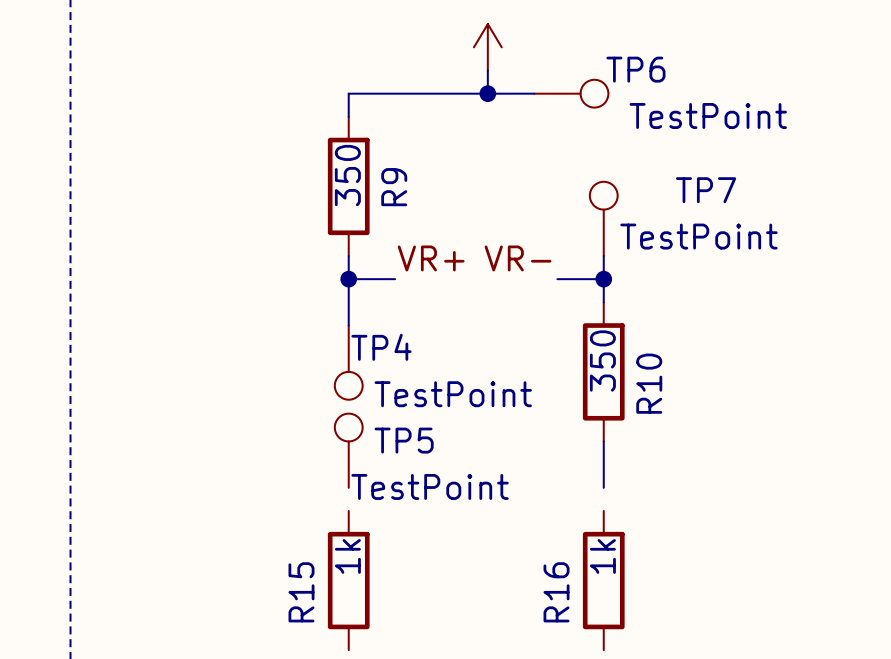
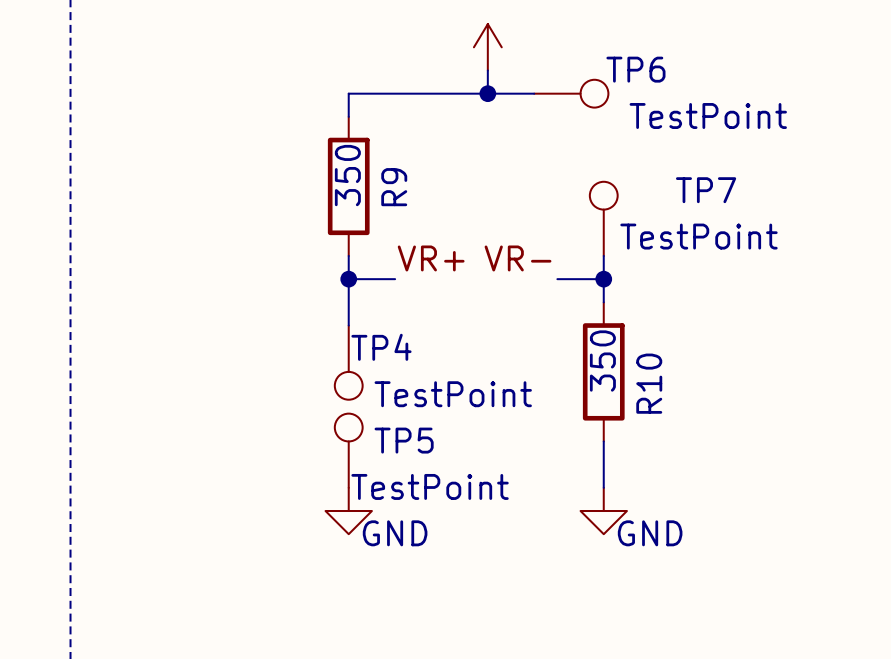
power symbol: none -> GND (348, 511)
power symbol: none -> GND (603, 511)
R15: 1k (348, 580) -> none
R16: 1k (603, 580) -> none

